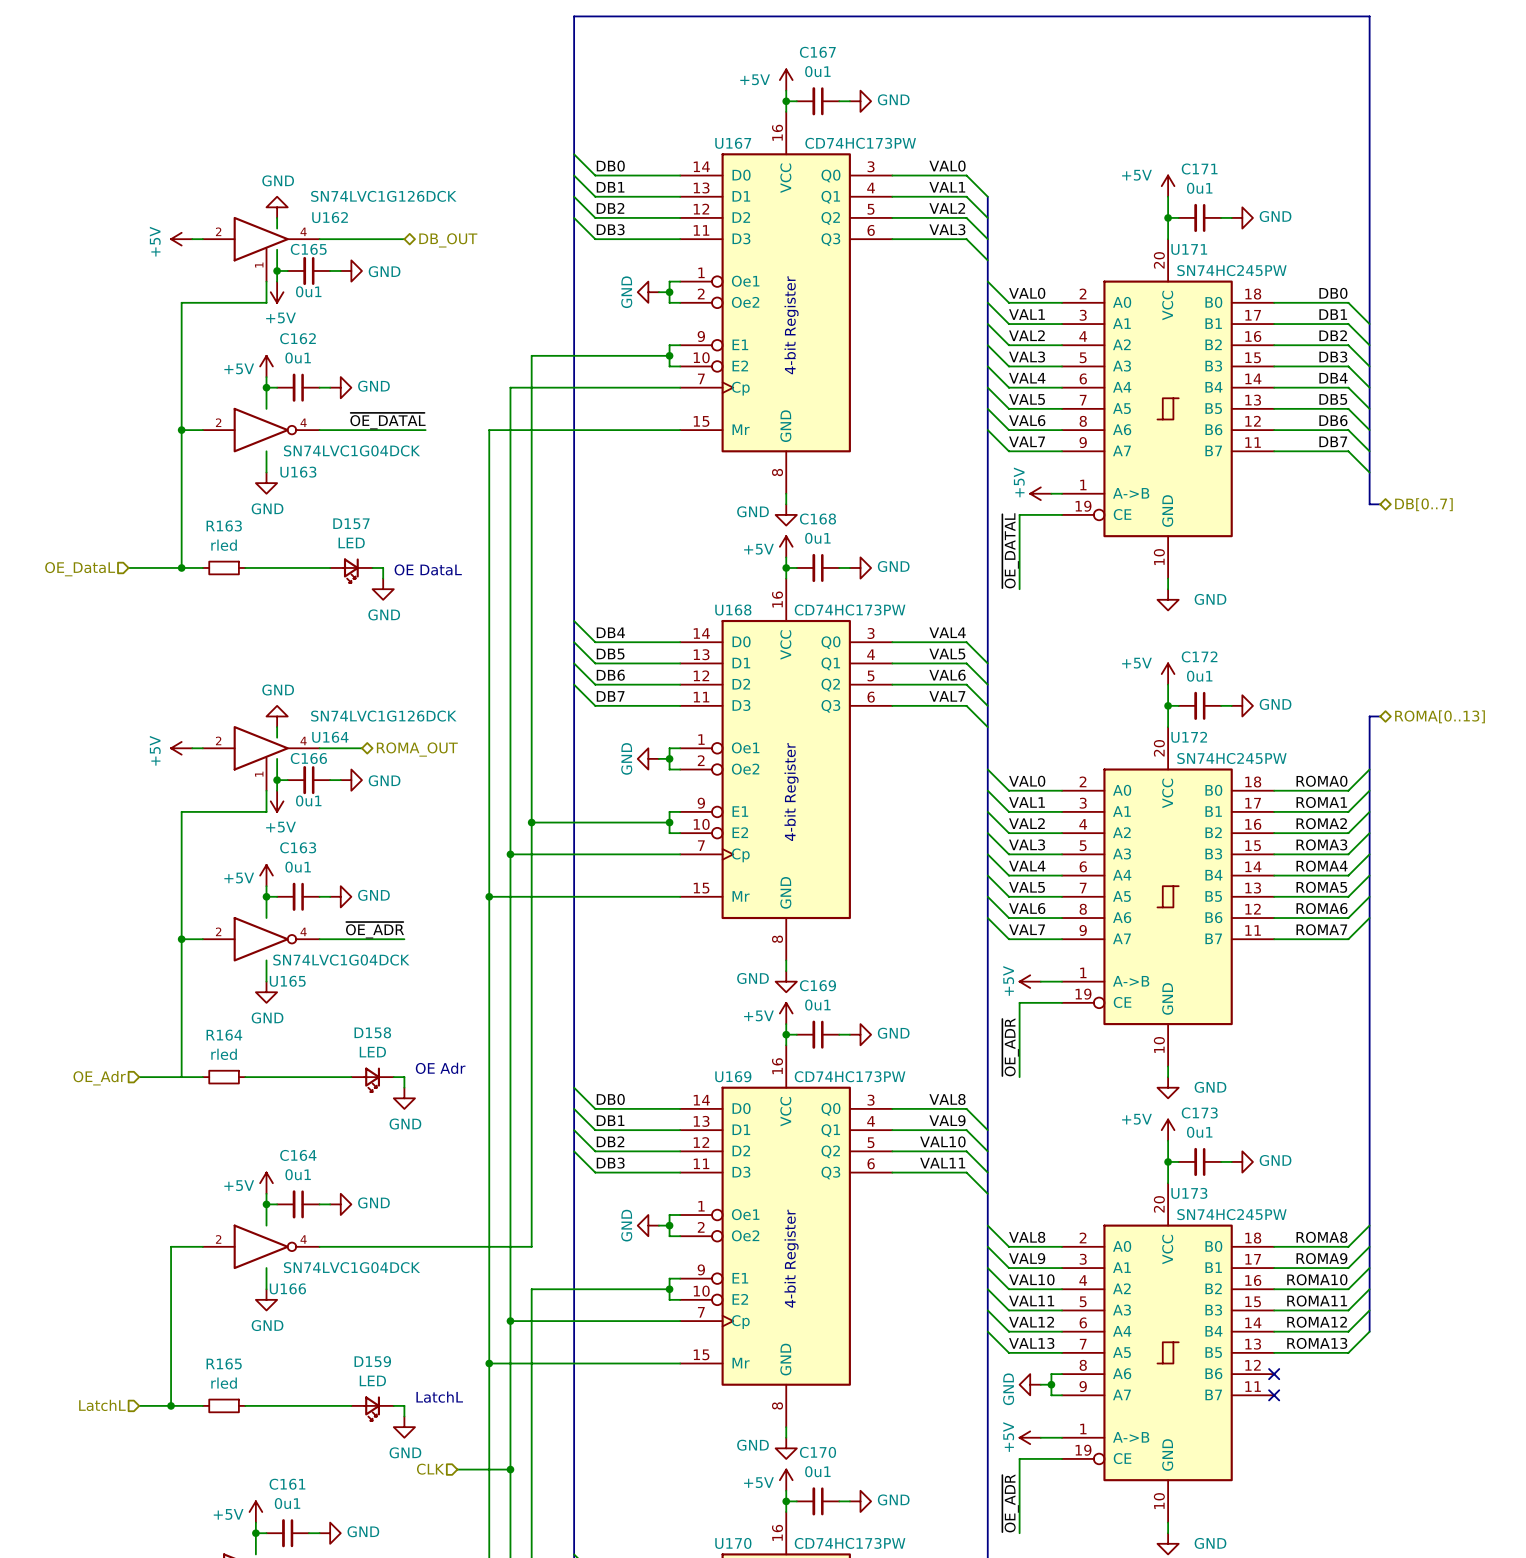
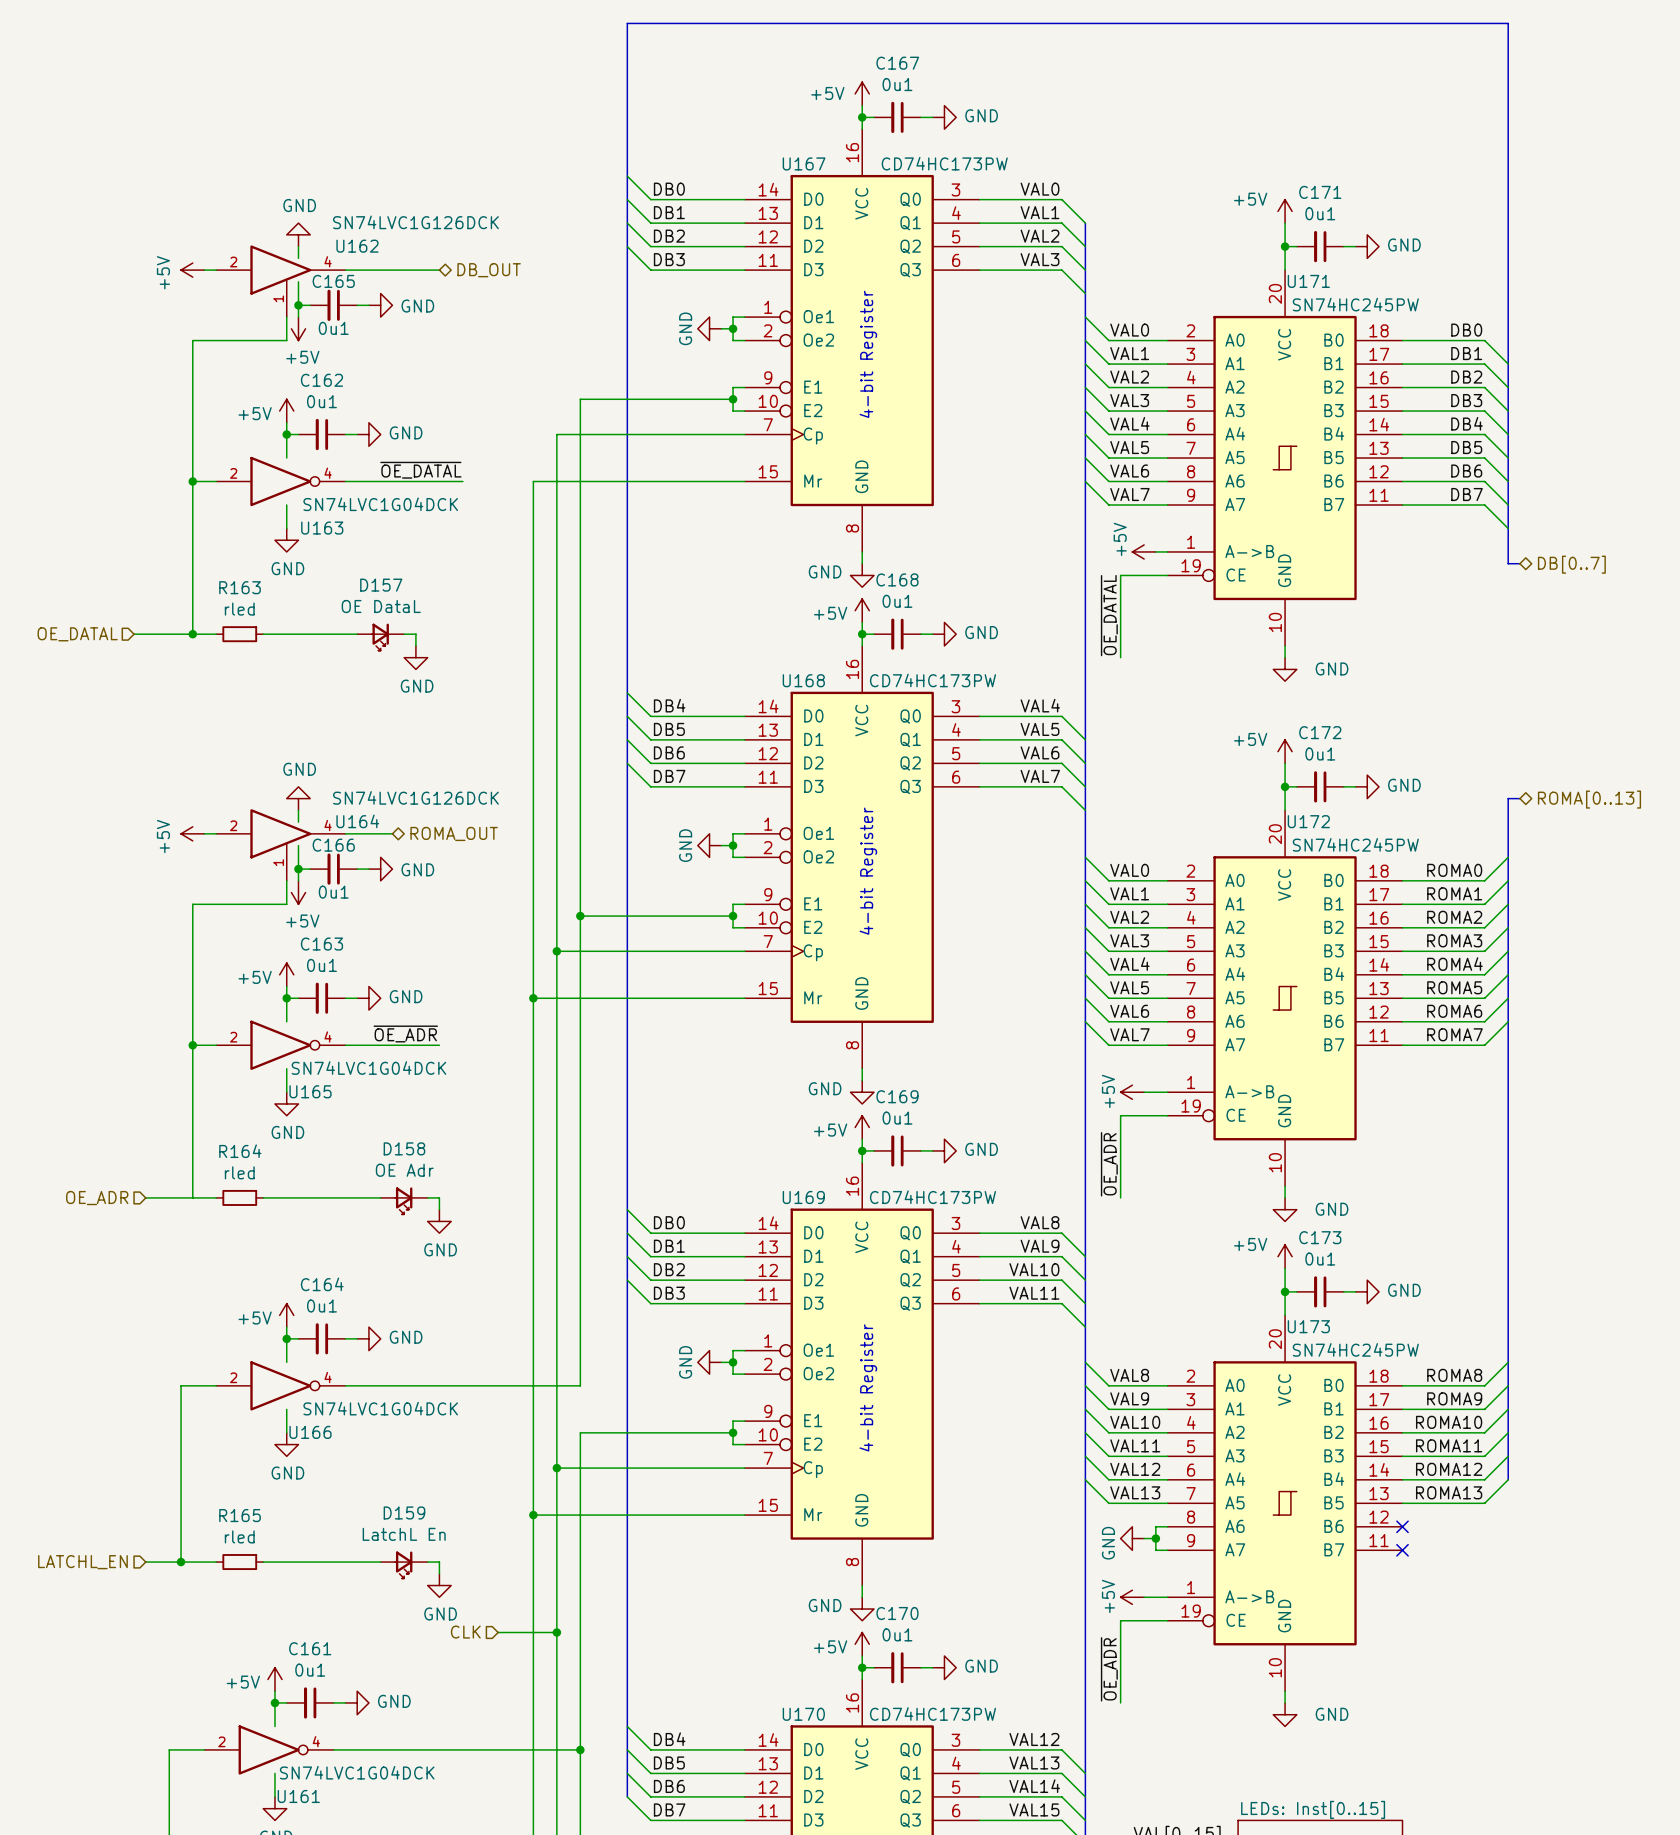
D157 value: LED (351, 542) -> OE DataL (381, 606)
hierarchical label: OE_DataL (80, 569) -> OE_DATAL (77, 634)
text: OE DataL (428, 569) -> none
D158 value: LED (372, 1052) -> OE Adr (404, 1170)
text: OE Adr (440, 1068) -> none
hierarchical label: OE_Adr (99, 1078) -> OE_ADR (97, 1198)
D159 value: LED (372, 1380) -> LatchL En (404, 1534)
text: LatchL (439, 1397) -> none
hierarchical label: LatchL (102, 1405) -> LATCHL_EN (82, 1562)

